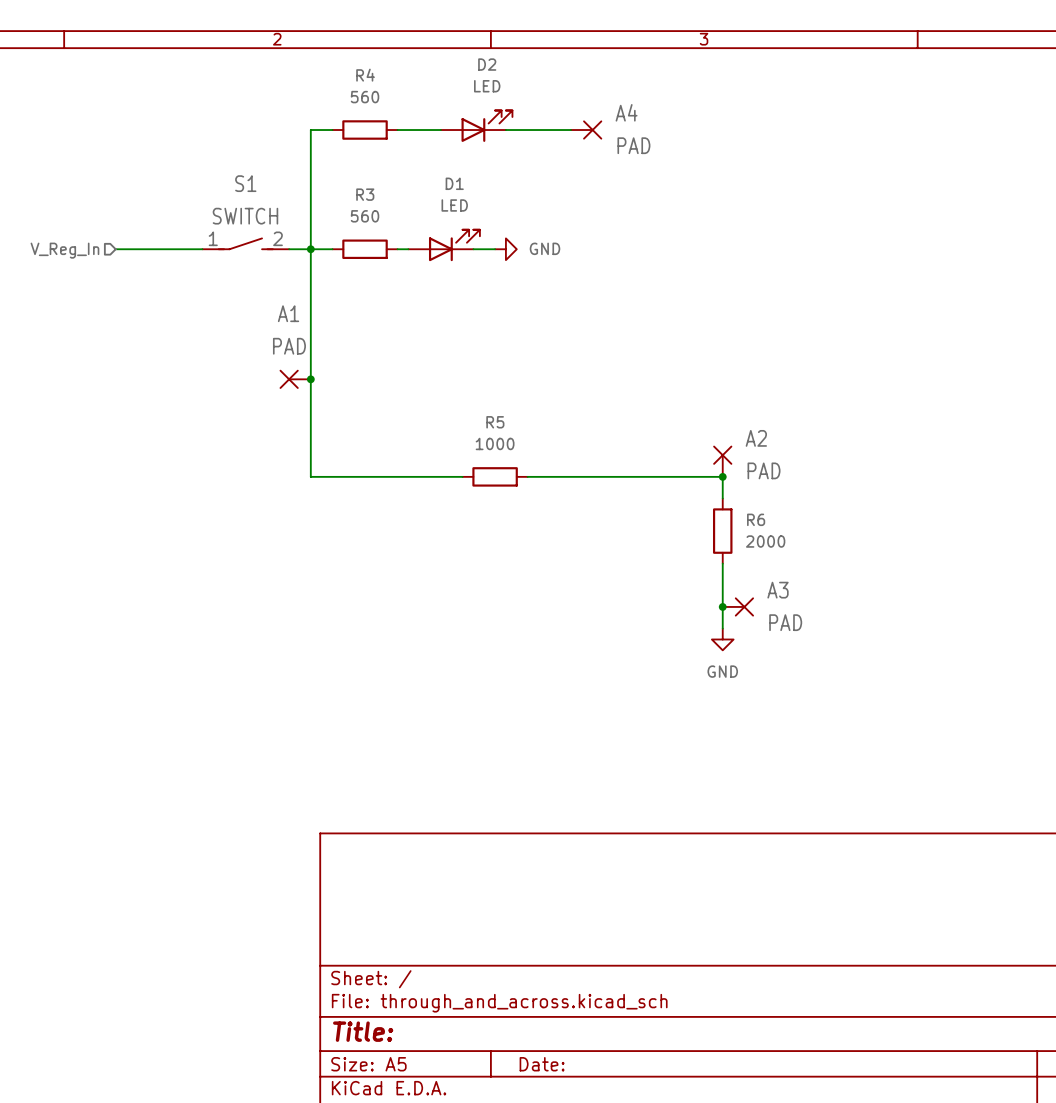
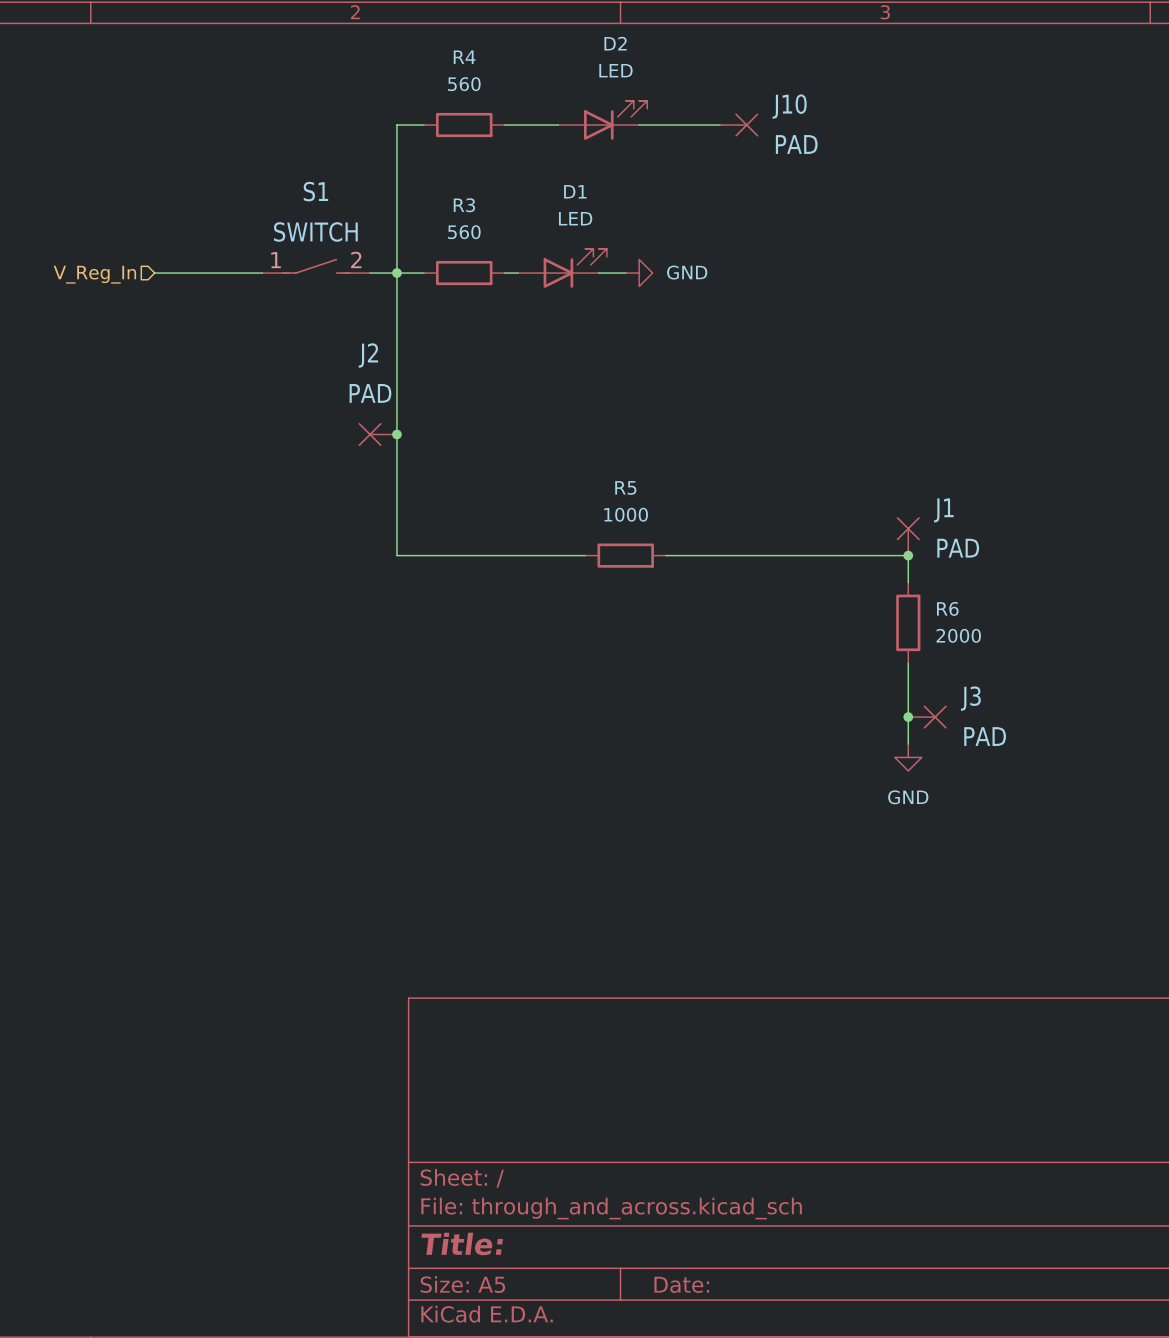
A4 name: A4 (626, 112) -> J10 (789, 106)
A1 name: A1 (288, 313) -> J2 (368, 355)
A2 name: A2 (756, 438) -> J1 (943, 510)
A3 name: A3 (778, 590) -> J3 (970, 698)

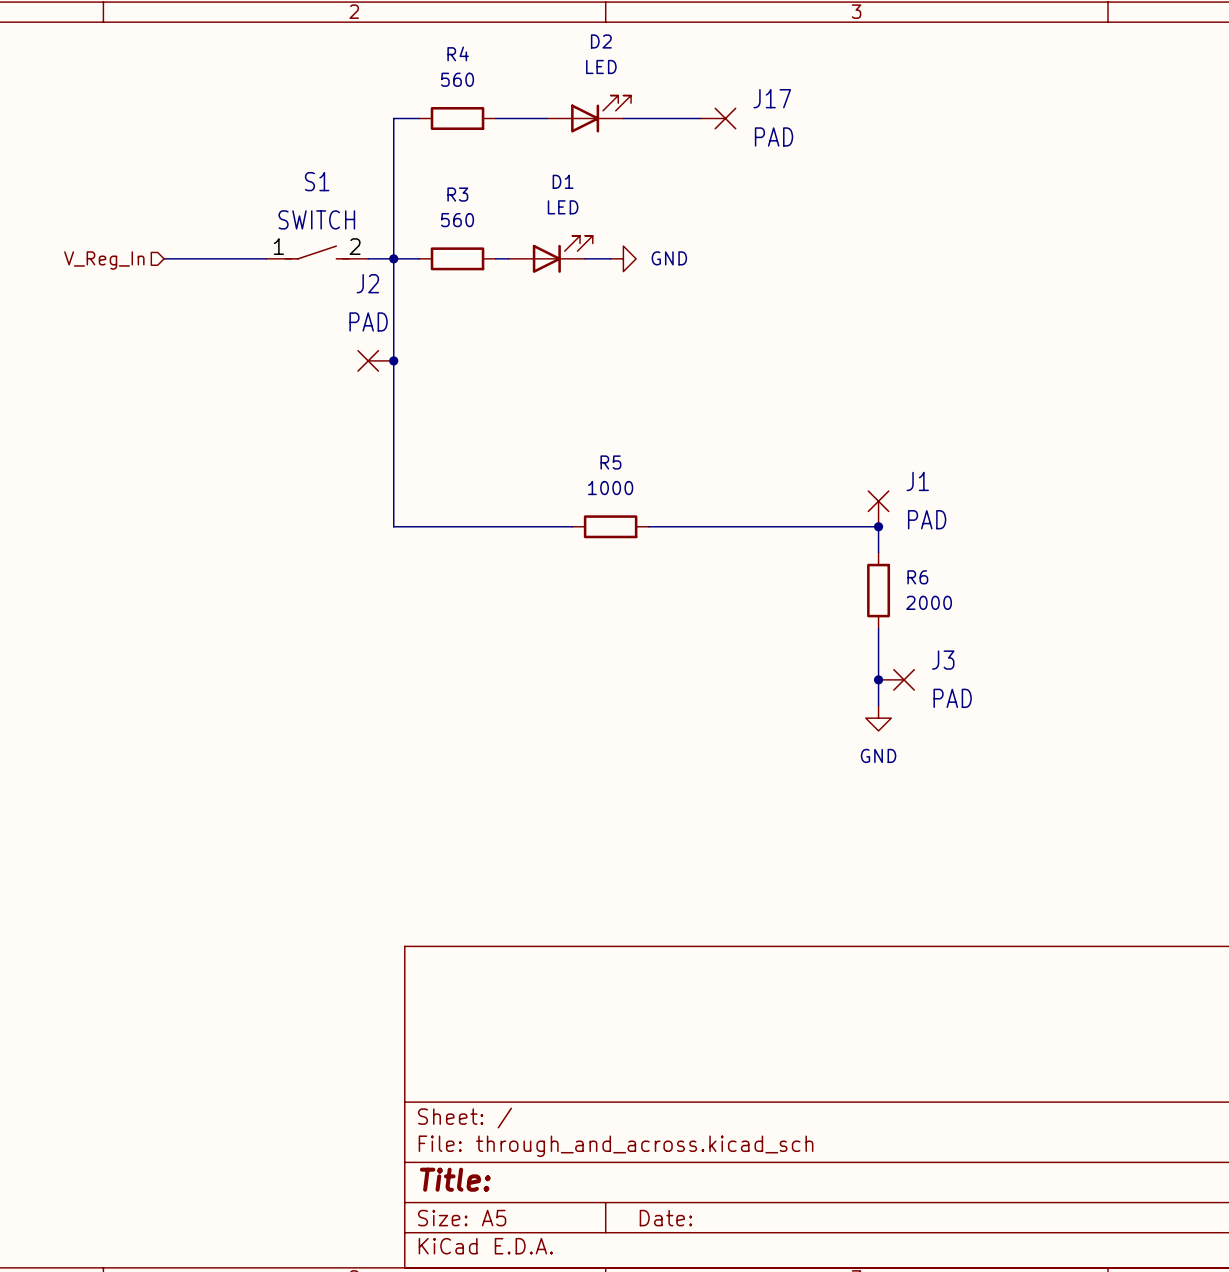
J10 name: J10 (789, 106) -> J17 (772, 98)
J2 position: (377, 434) -> (375, 360)
junction position: (396, 434) -> (393, 360)

